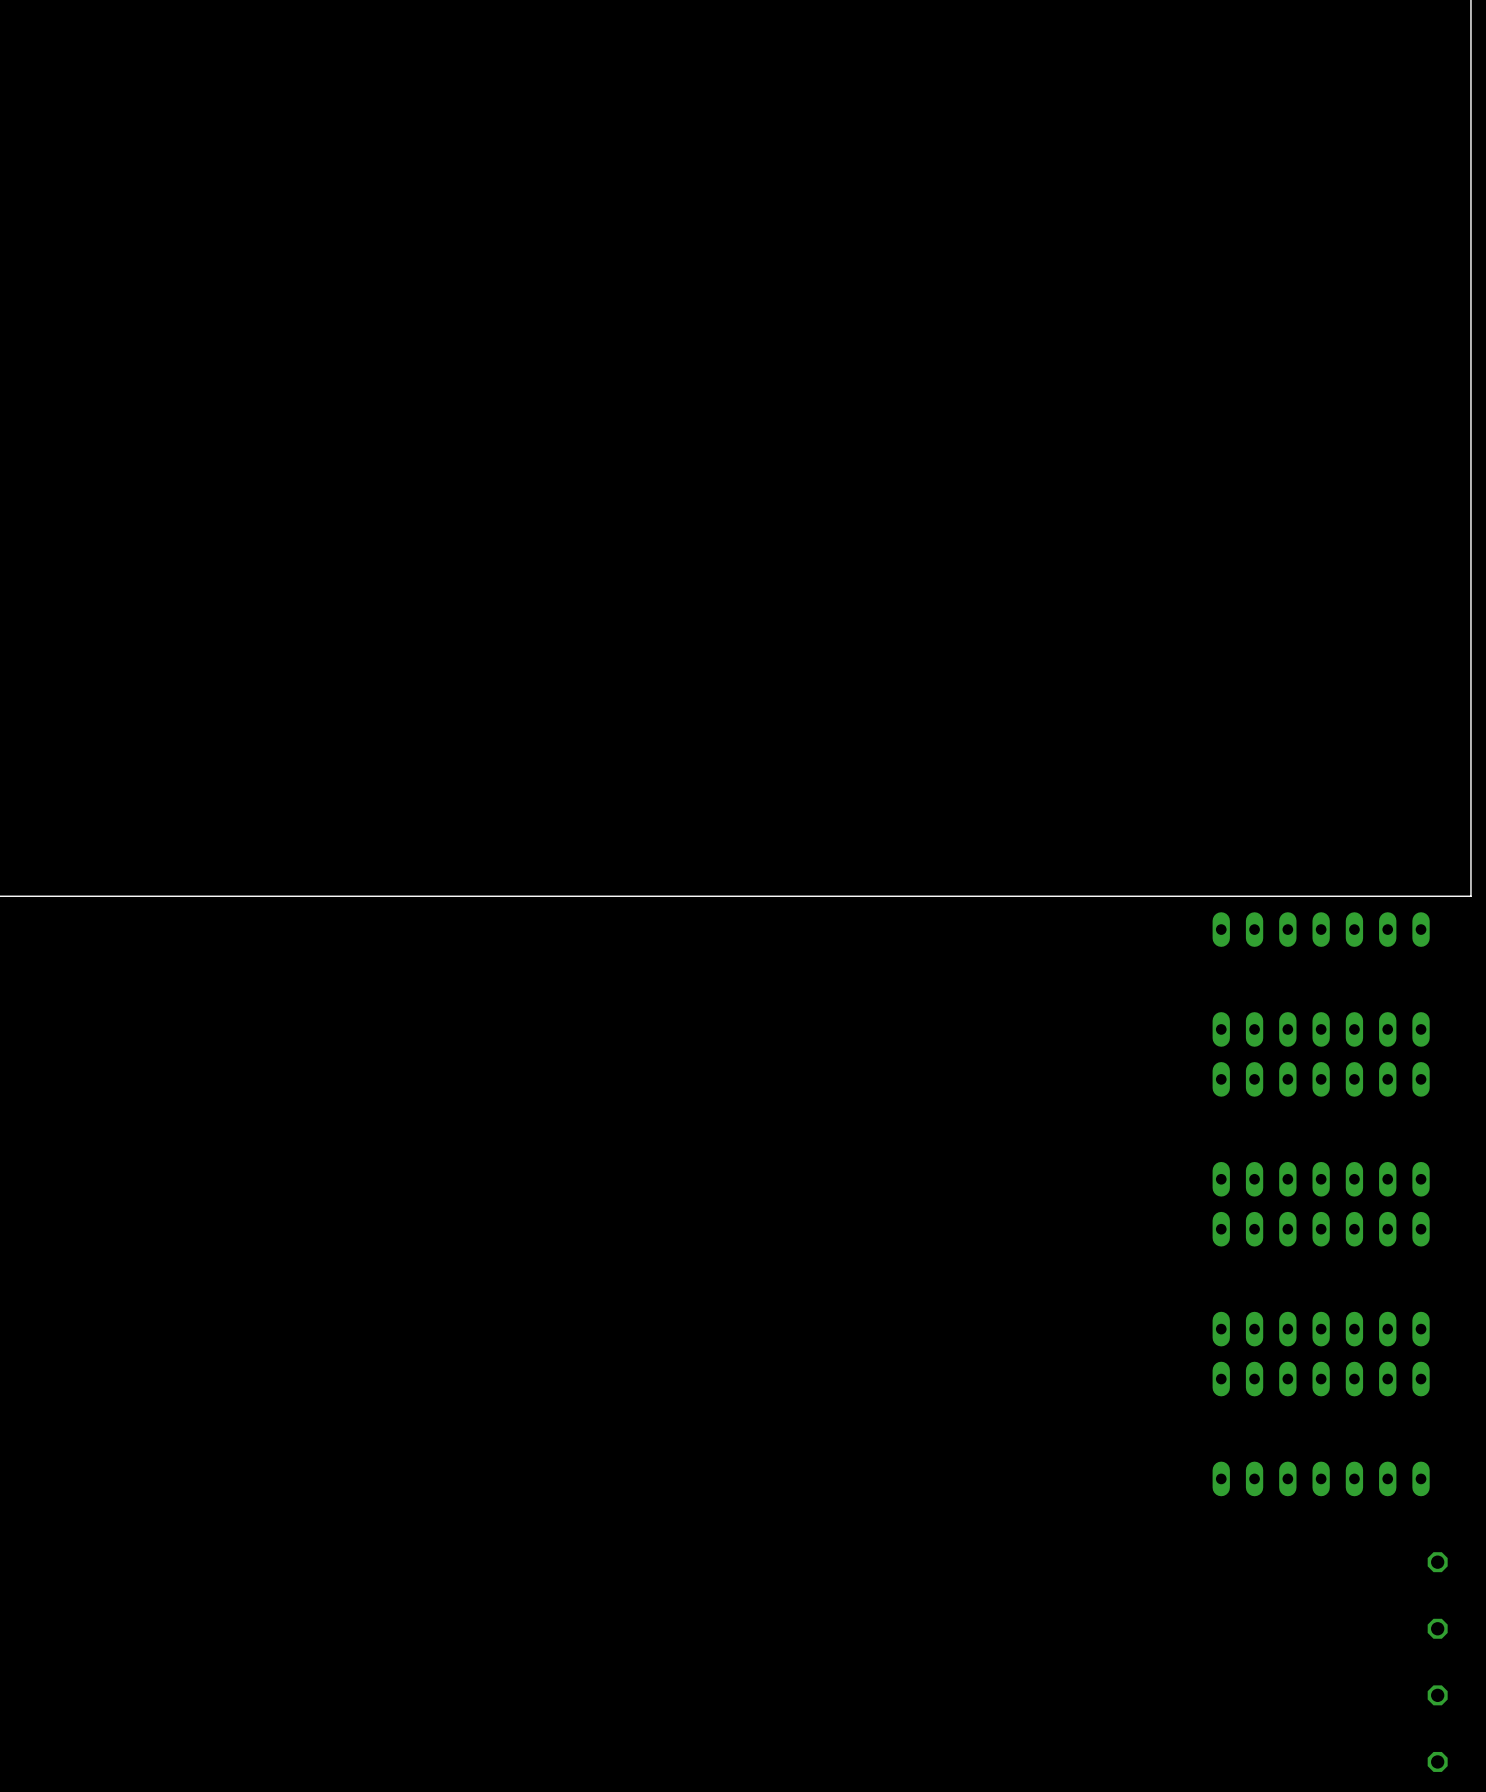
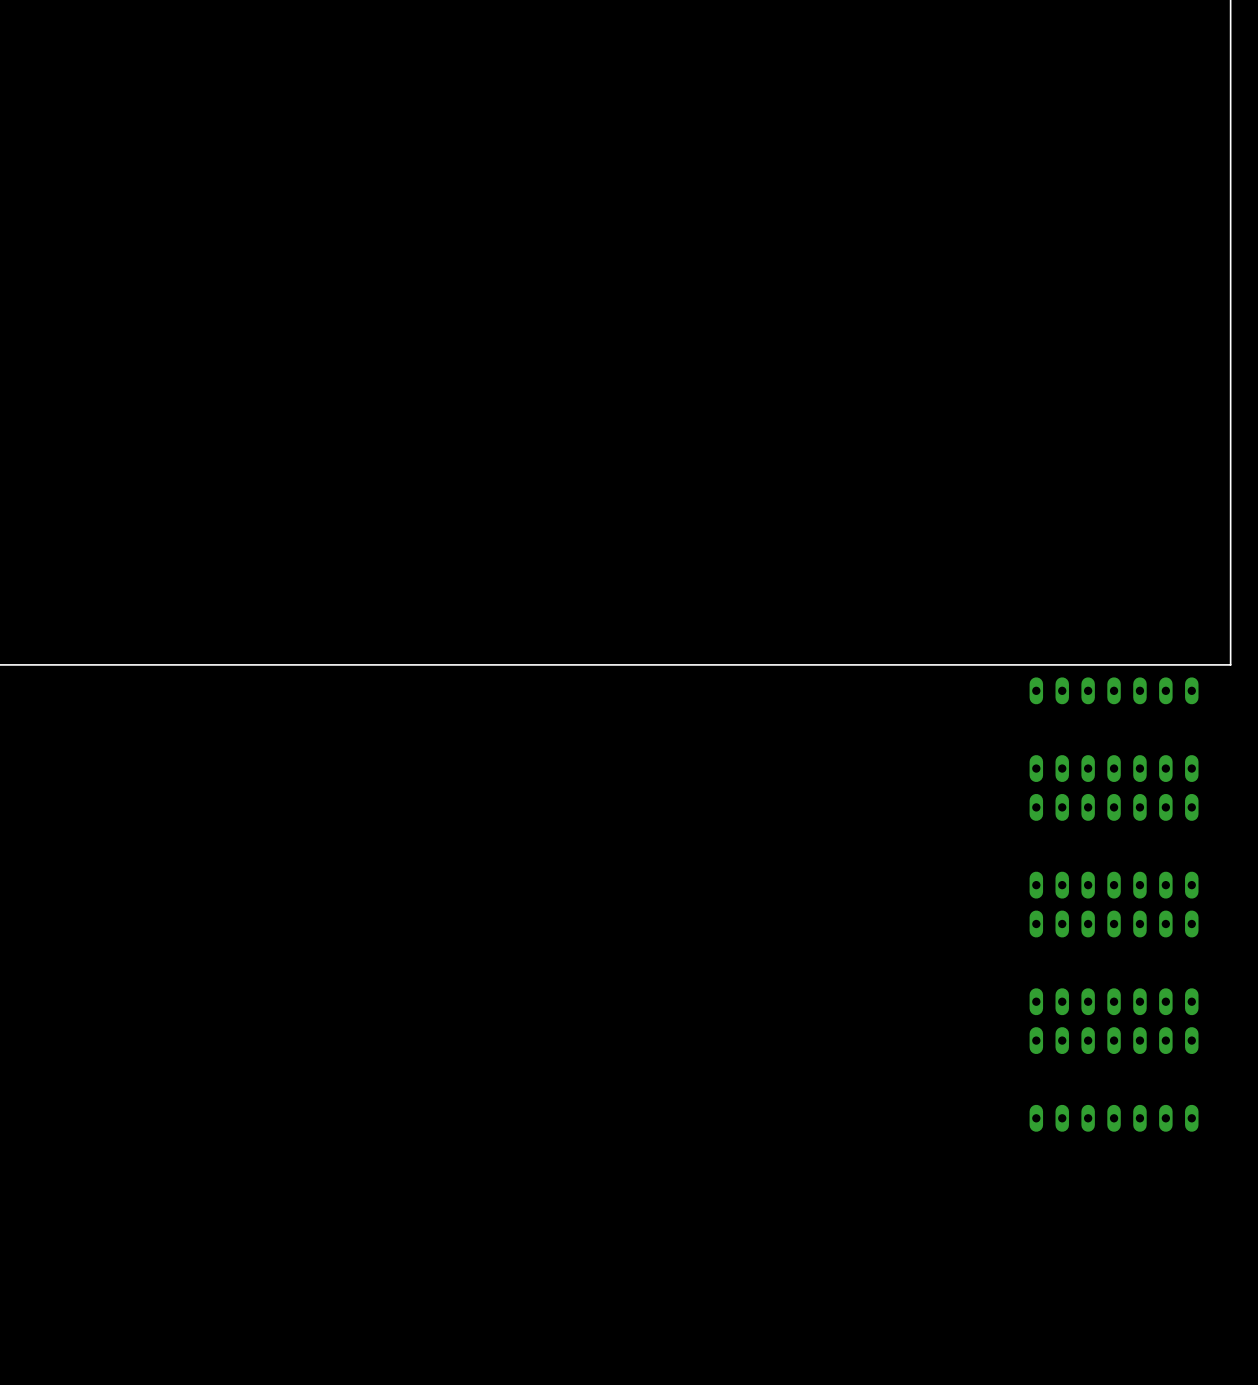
part: (1437, 1562) -> none
part: (1437, 1628) -> none
part: (1437, 1695) -> none
part: (1437, 1761) -> none

